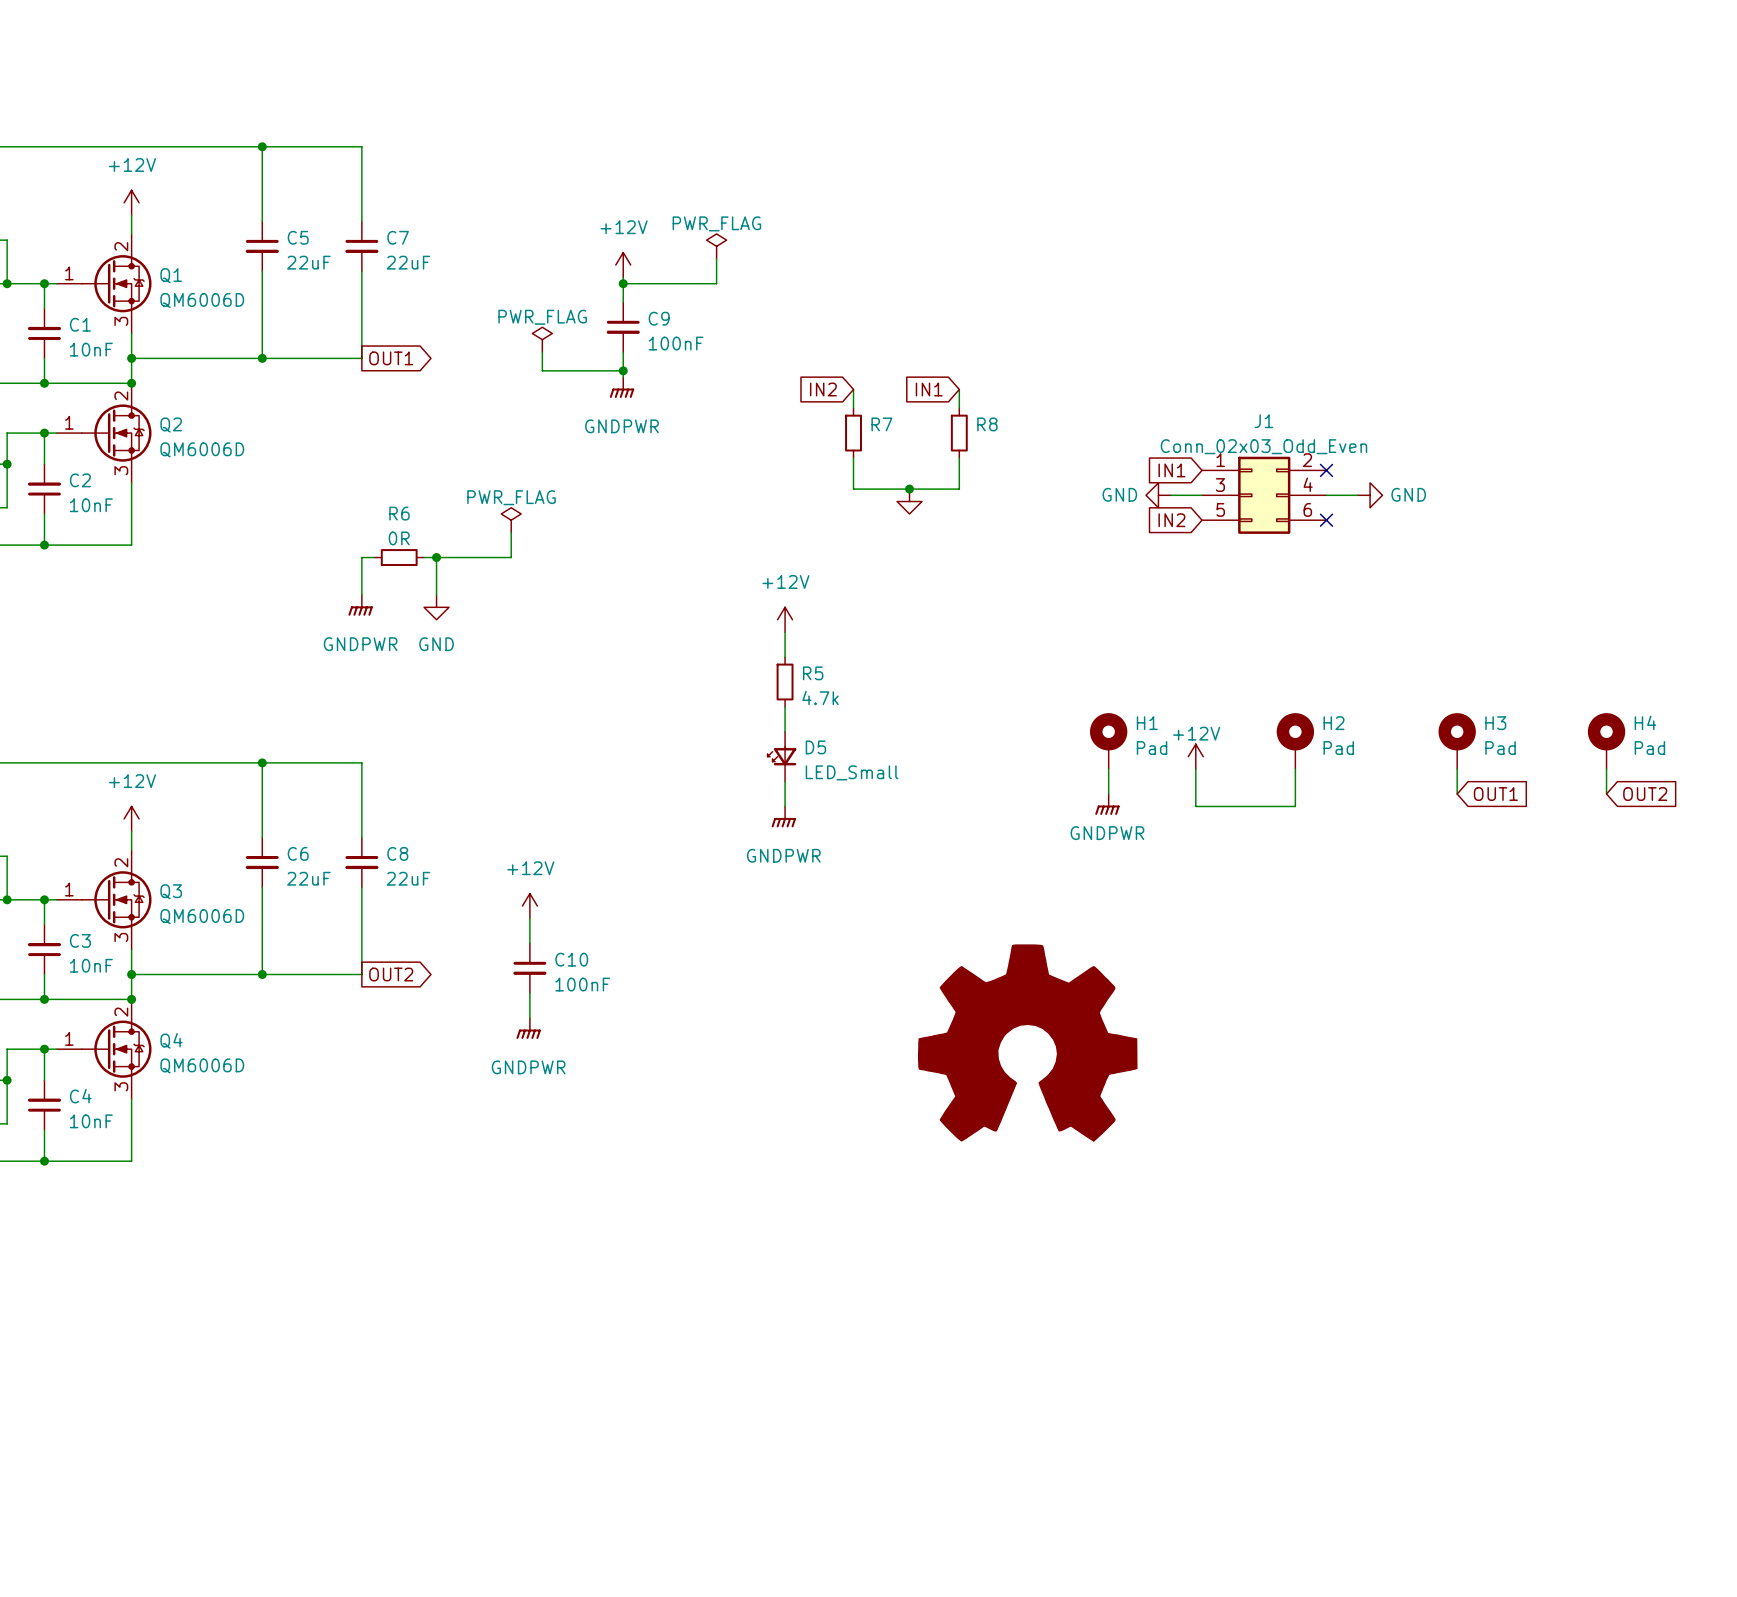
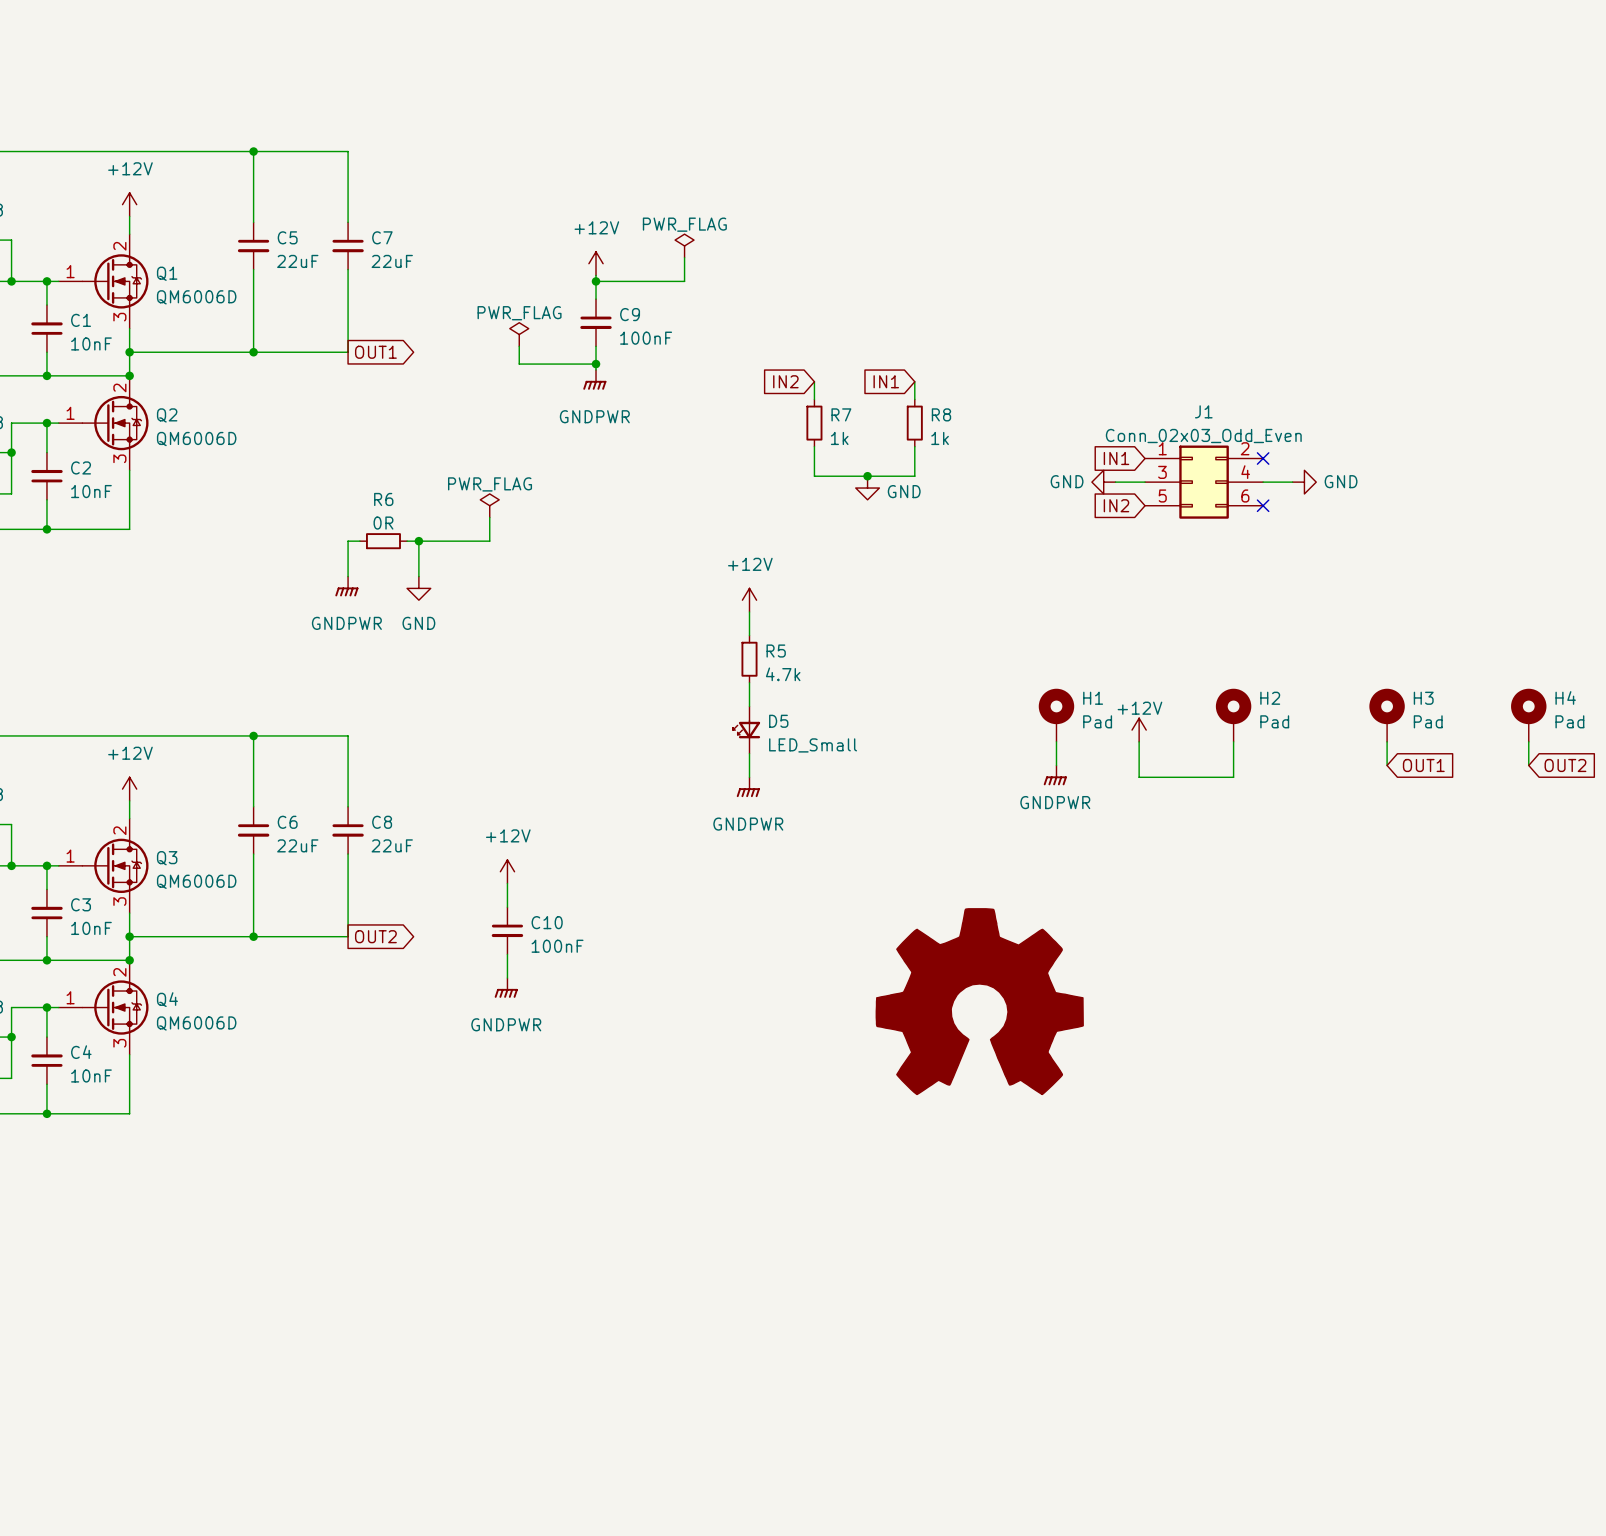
R7 value: none -> 1k (839, 438)
R8 value: none -> 1k (940, 438)
power symbol text: none -> GND (904, 491)

